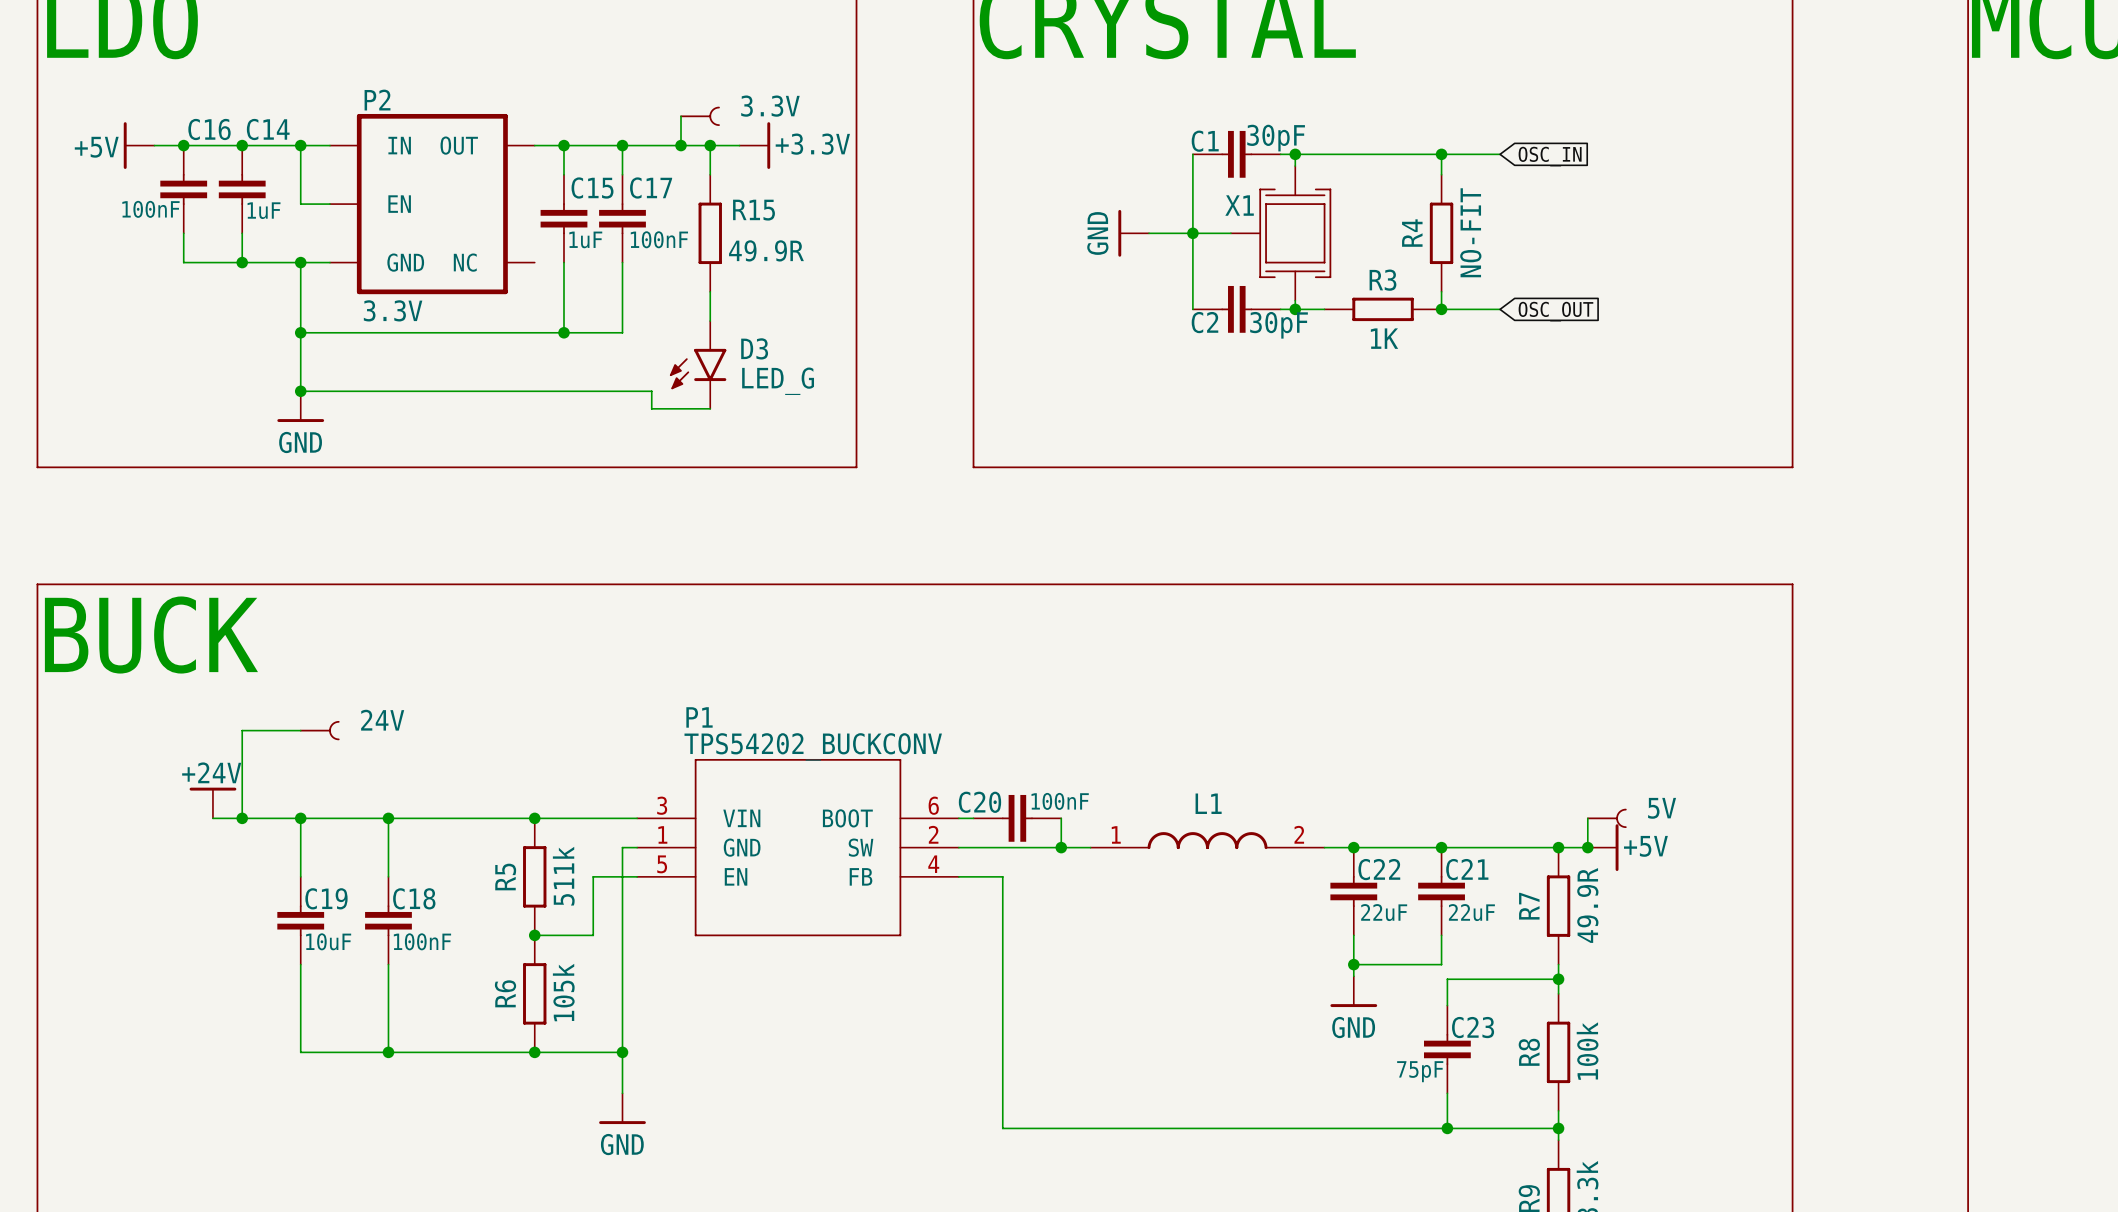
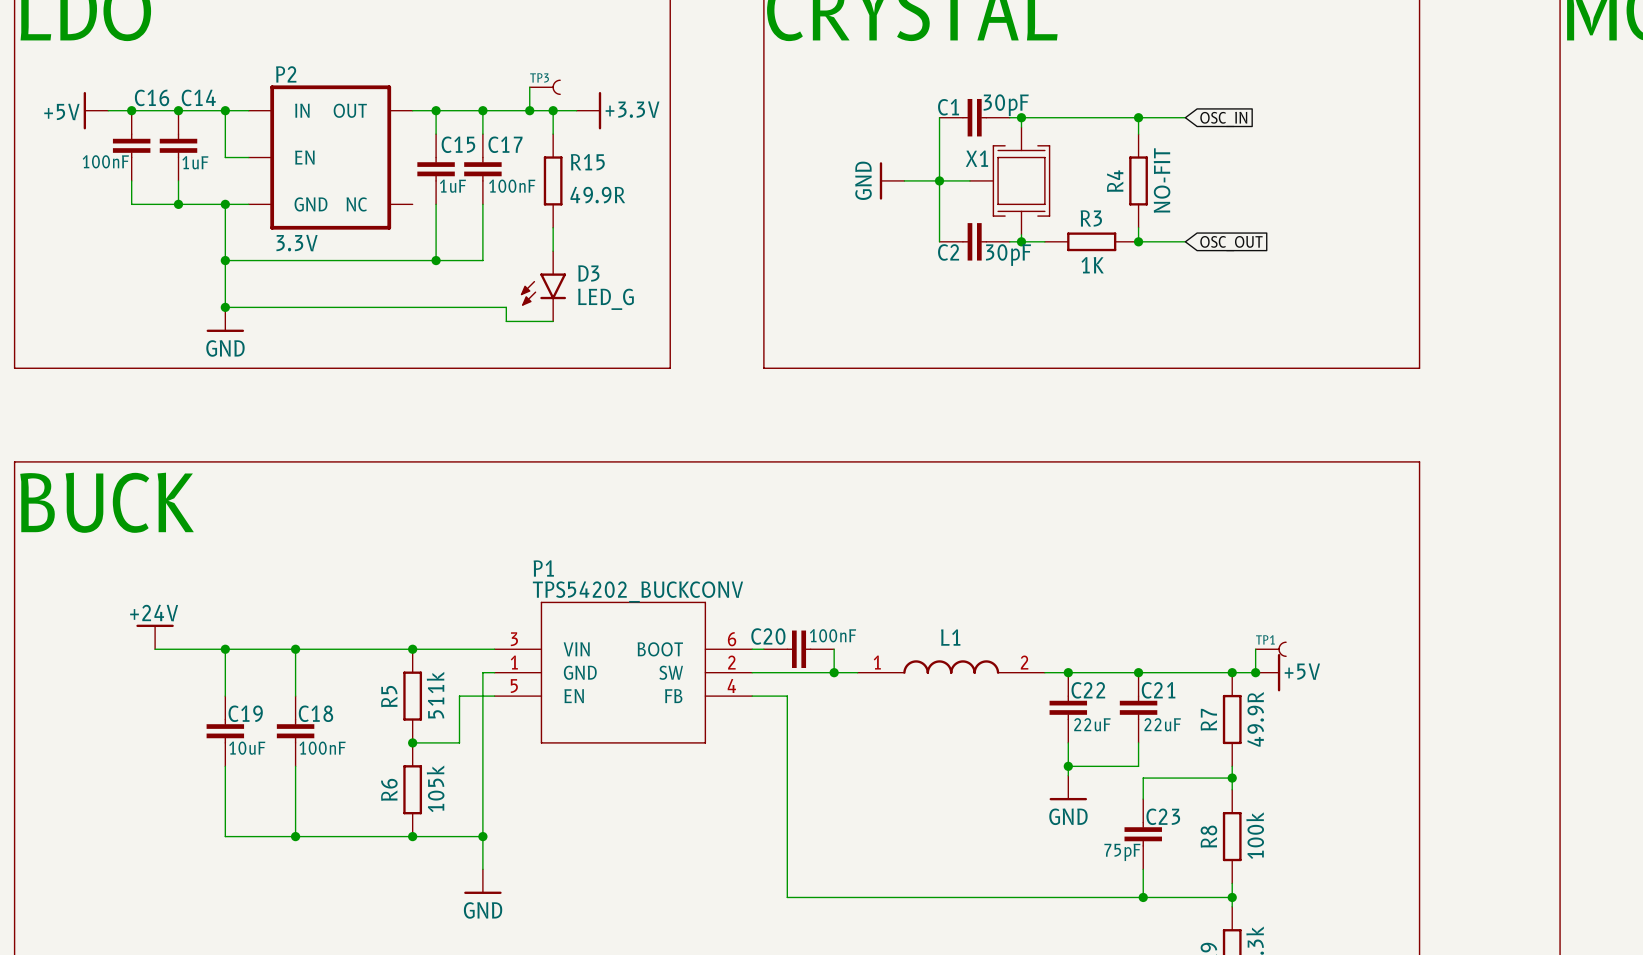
3.3V name: 3.3V (770, 106) -> TP3 (539, 77)
wire: (300, 730) (242, 730) (242, 818) -> none
24V: (319, 730) -> none
5V name: 5V (1662, 808) -> TP1 (1265, 639)
junction: (242, 818) -> none

